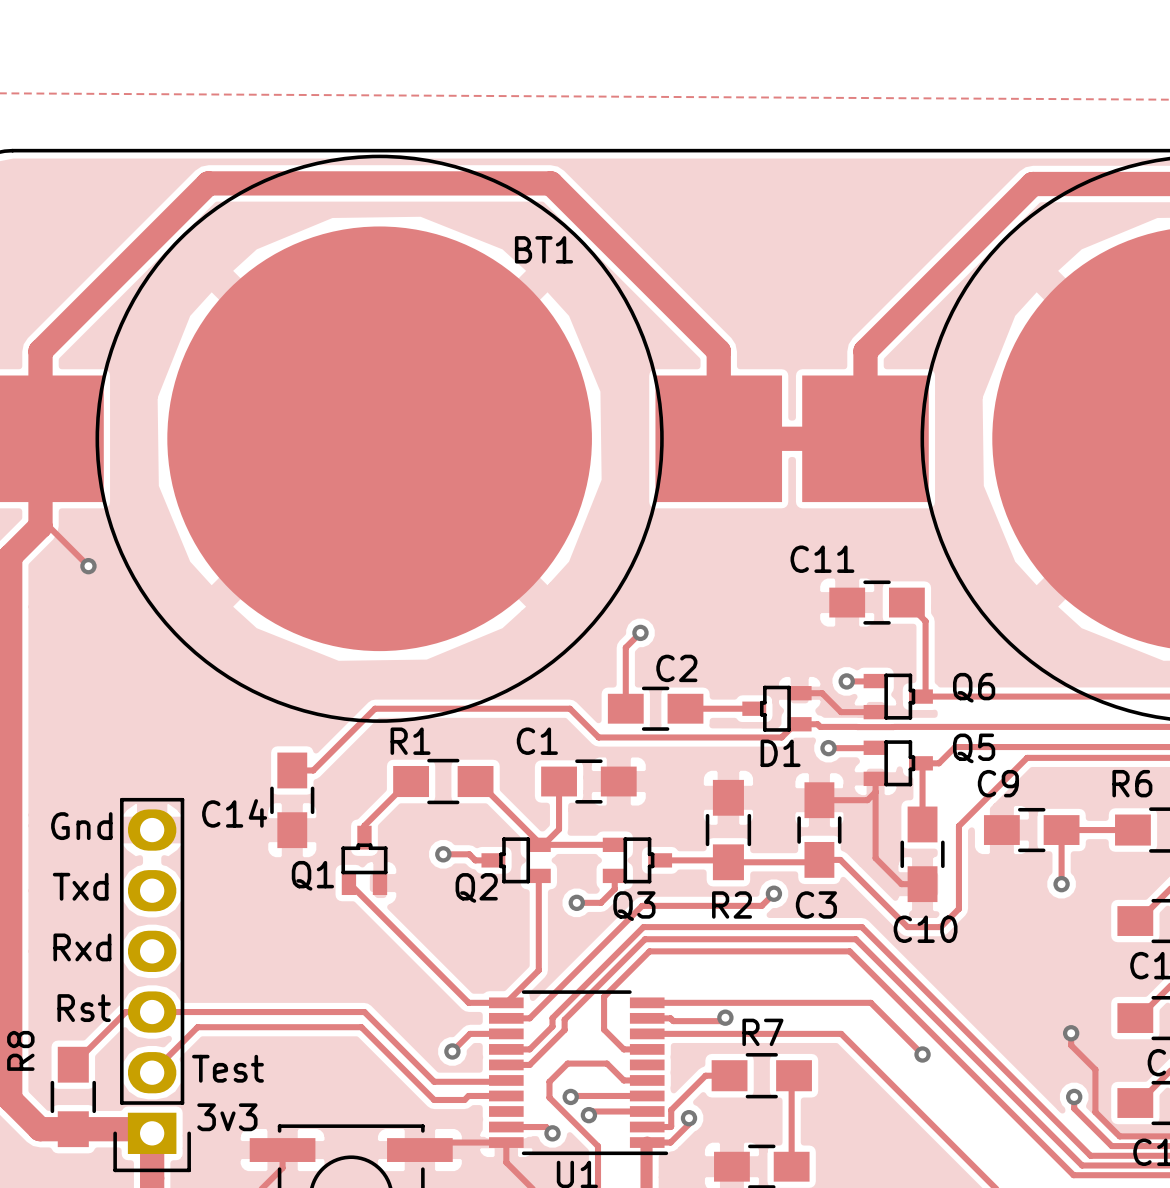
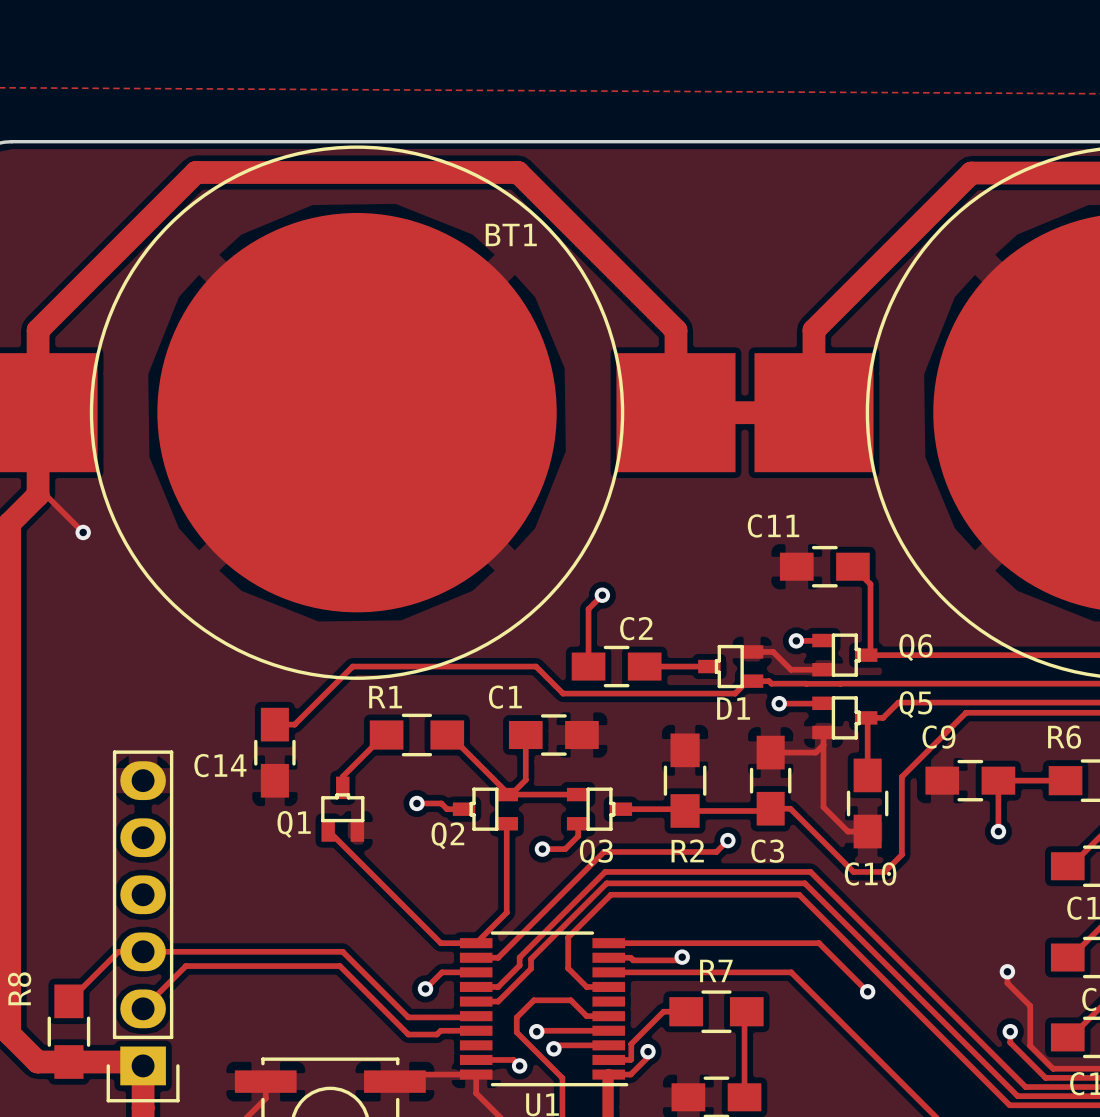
text: Gnd (81, 826) -> none
text: Txd (80, 886) -> none
text: Rxd (82, 947) -> none
text: Rst (84, 1008) -> none
text: Test (227, 1068) -> none
text: 3v3 (227, 1117) -> none

